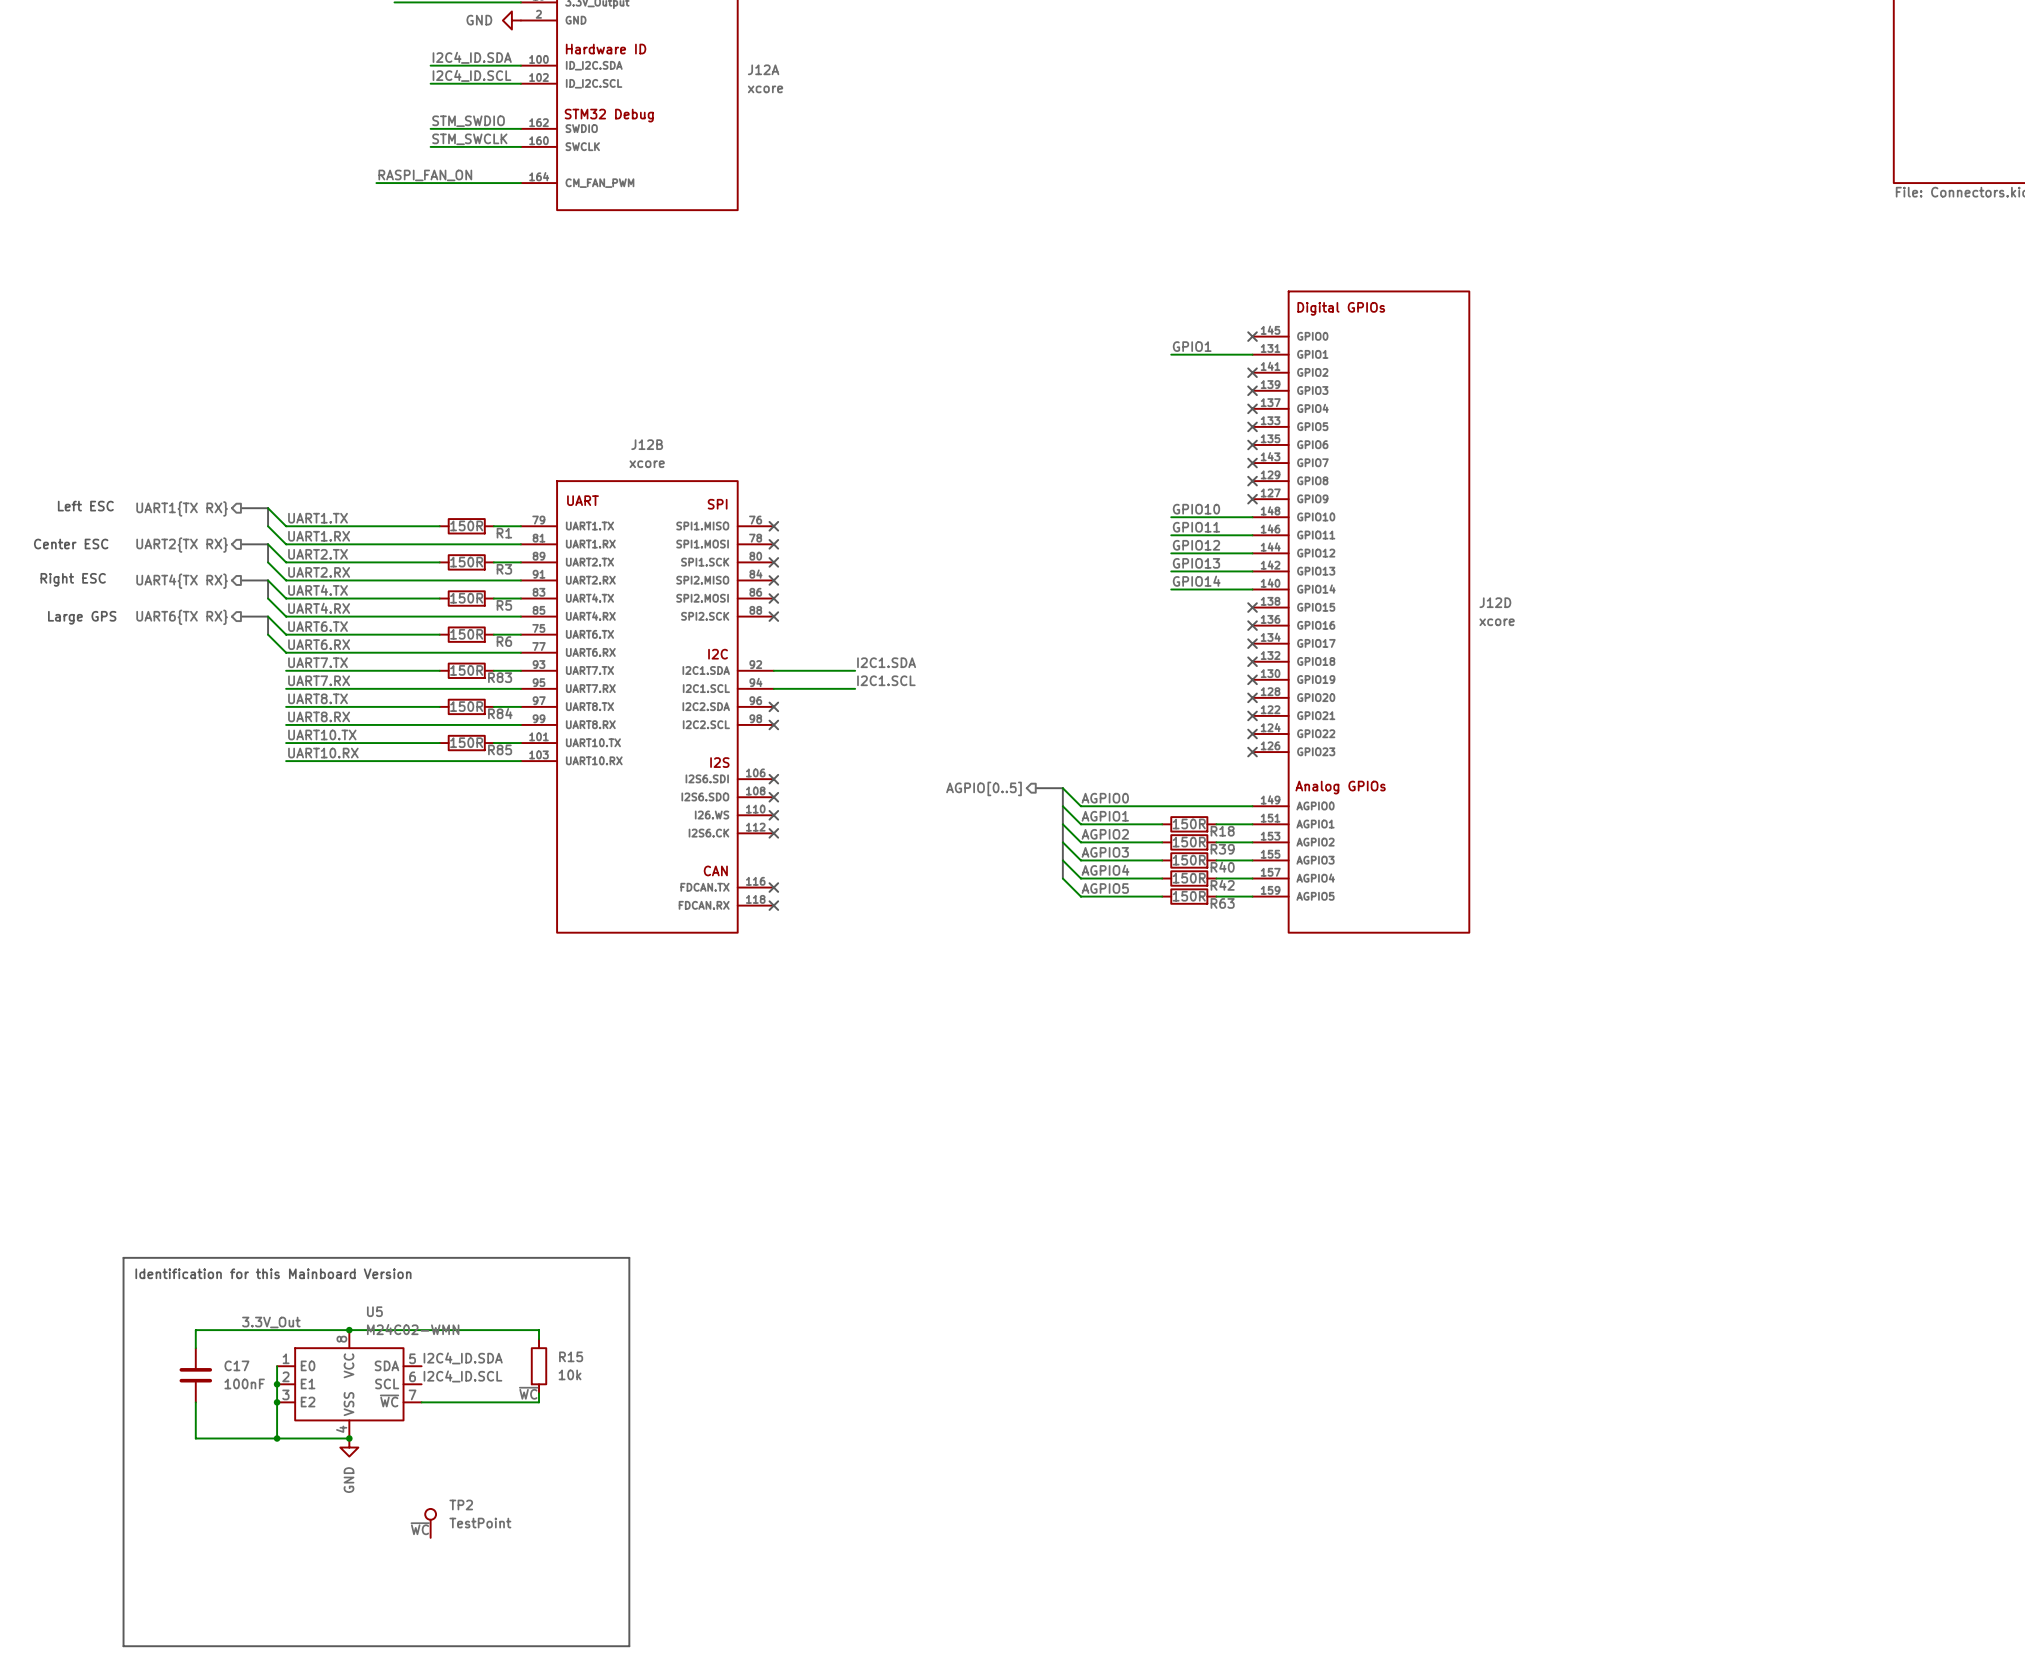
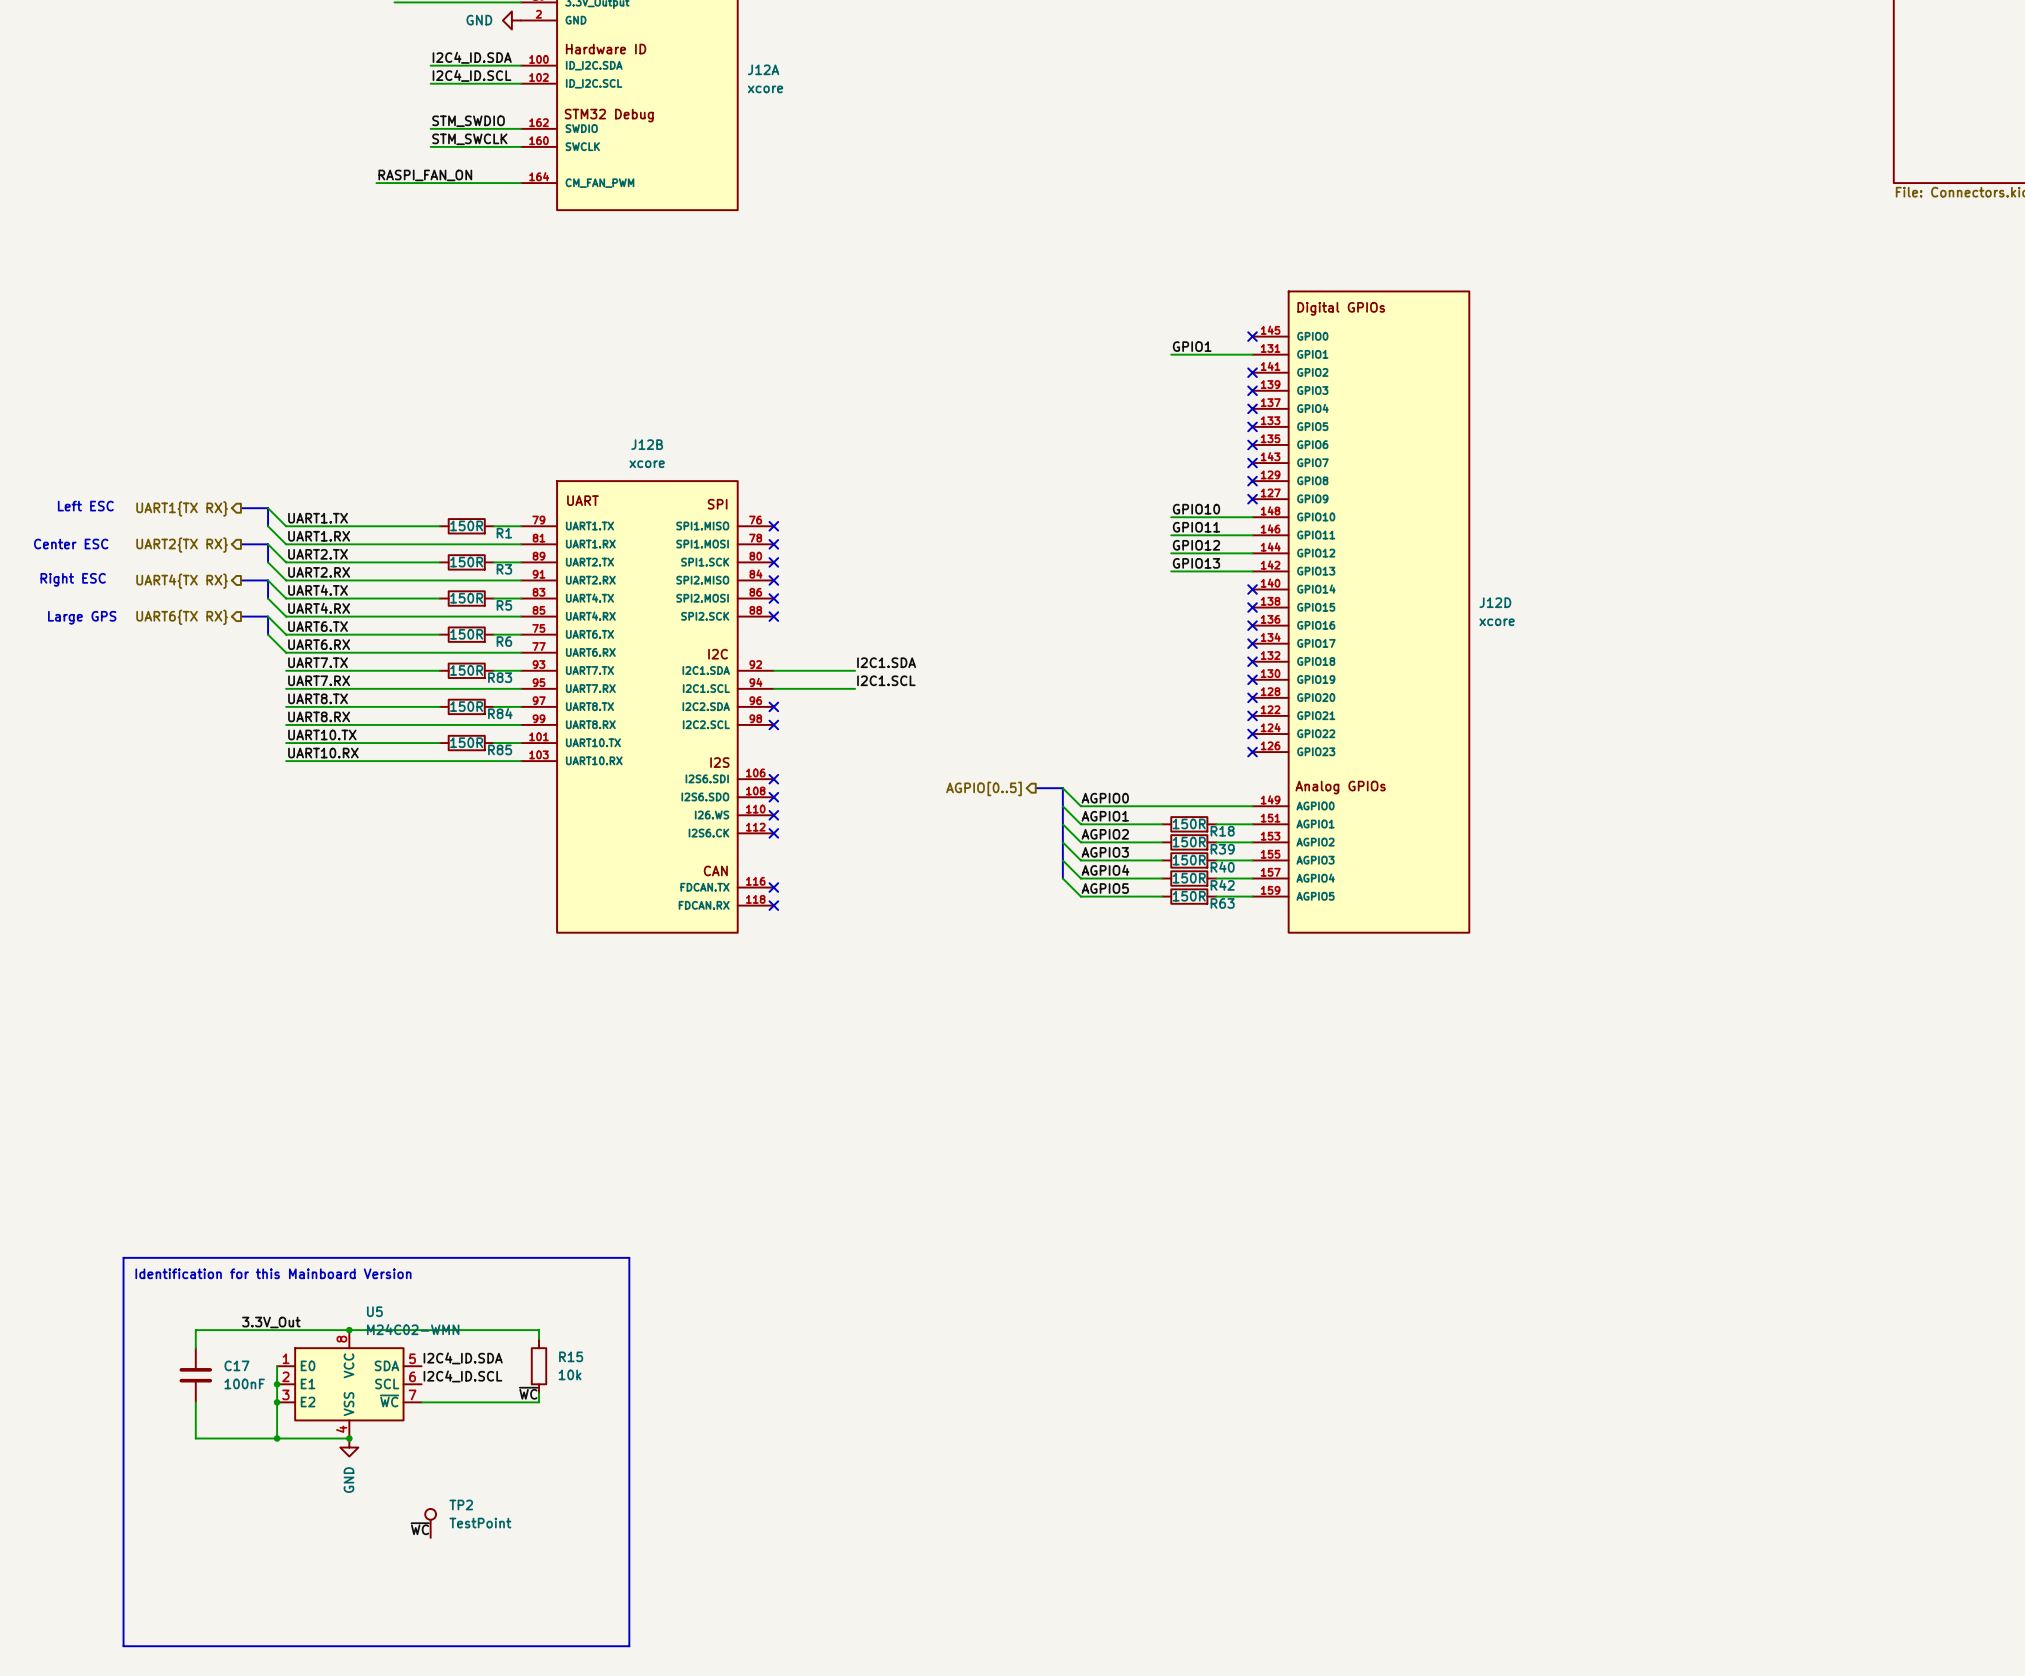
label: GPIO14 (1196, 581) -> none
wire: (1171, 589) (1252, 589) -> none
no-connect mark: none -> (1252, 589)

